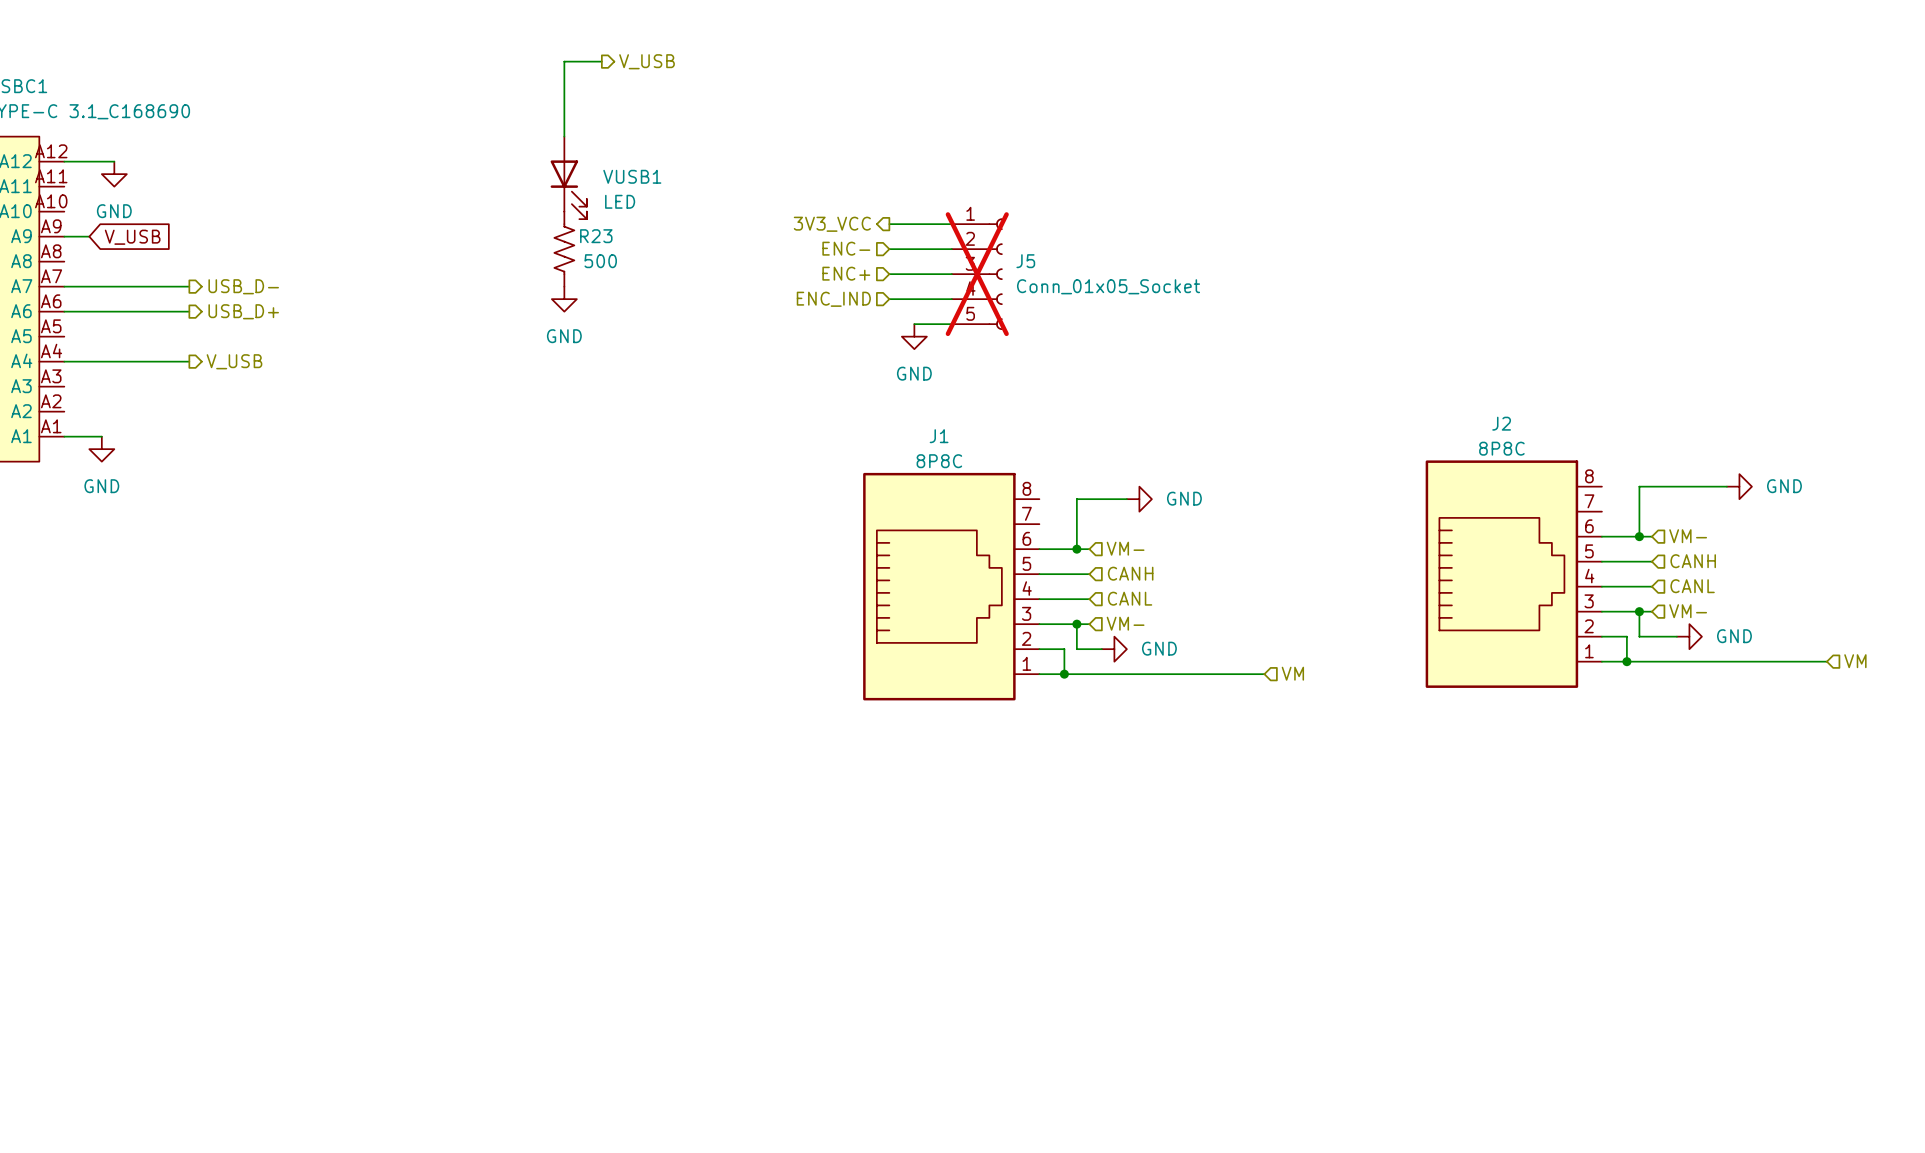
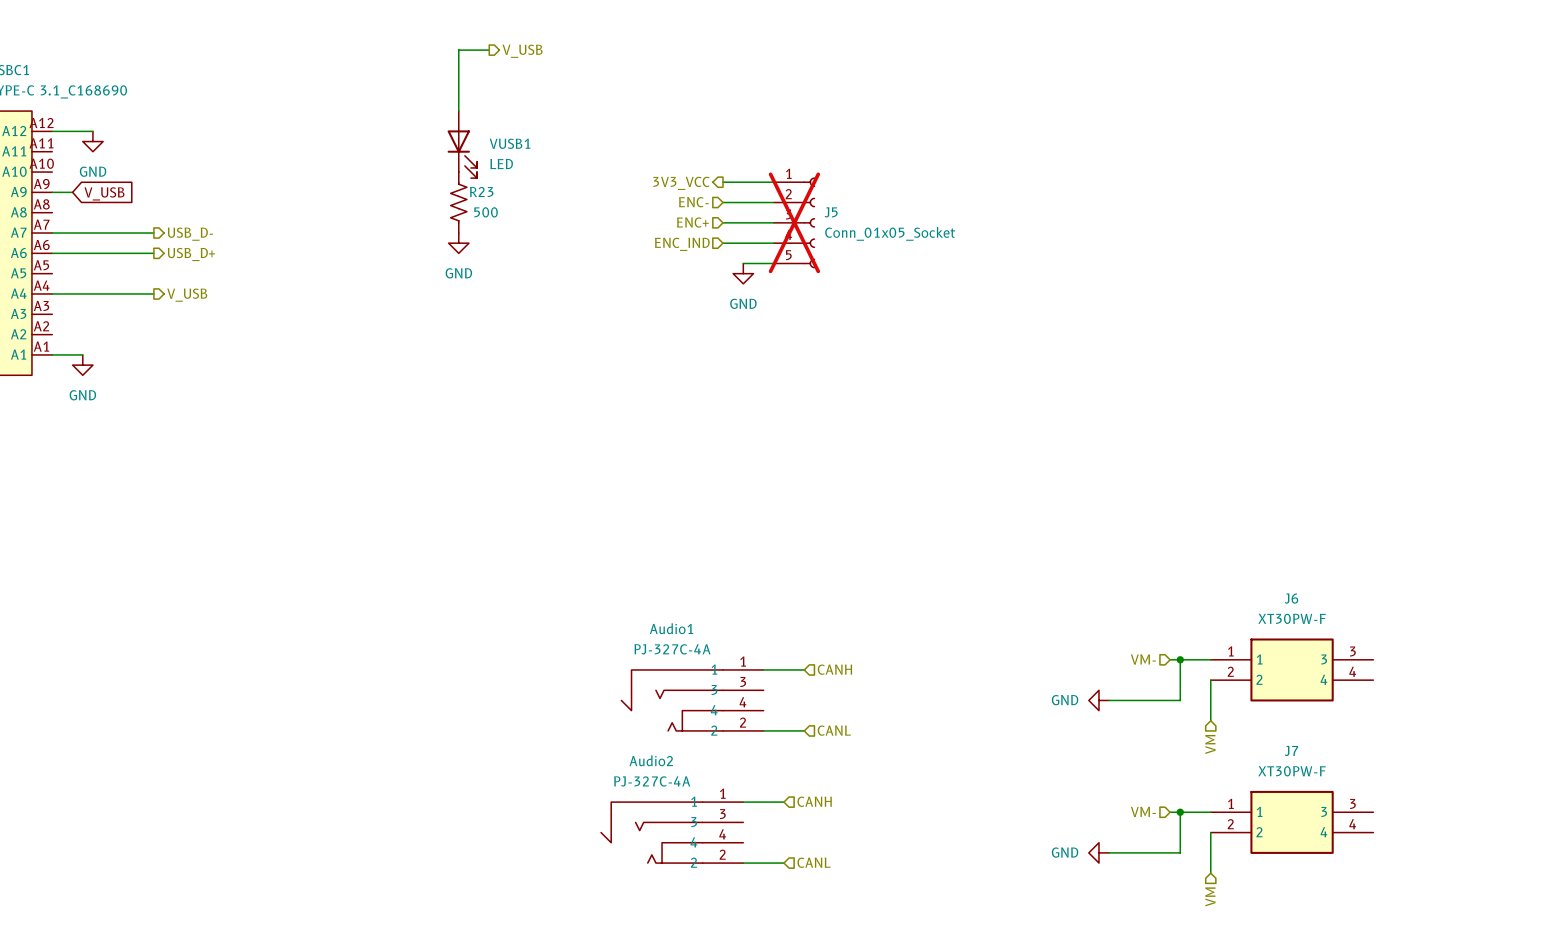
wire: (1726, 486) (1639, 486) (1639, 536) -> none
power symbol: GND (1739, 486) -> none
wire: (1126, 499) (1076, 499) (1076, 549) -> none
power symbol: GND (1139, 499) -> none
wire: (1601, 536) (1651, 536) -> none
junction: (1639, 536) -> none
hierarchical label: VM- (1688, 536) -> none
hierarchical label: VM- (1125, 548) -> none
wire: (1039, 549) (1089, 549) -> none
junction: (1076, 549) -> none
wire: (1601, 561) (1651, 561) -> none
hierarchical label: CANH (1693, 561) -> none
hierarchical label: CANH (1130, 573) -> none
wire: (1039, 574) (1089, 574) -> none
J2: 8P8C (1513, 574) -> none
J1: 8P8C (951, 586) -> none
wire: (1601, 586) (1651, 586) -> none
hierarchical label: CANL (1692, 586) -> none
hierarchical label: CANL (1130, 598) -> none
wire: (1039, 599) (1089, 599) -> none
wire: (1601, 611) (1651, 611) -> none
wire: (1639, 611) (1639, 636) (1676, 636) -> none
junction: (1639, 611) -> none
hierarchical label: VM- (1688, 611) -> none
hierarchical label: VM- (1125, 623) -> none
wire: (1039, 624) (1089, 624) -> (763, 669) (804, 669)
wire: (1076, 624) (1076, 649) (1101, 649) -> none
junction: (1076, 624) -> none
wire: (1601, 636) (1626, 636) (1626, 661) -> none
power symbol: GND (1689, 636) -> none
wire: (1039, 649) (1064, 649) (1064, 674) -> none
power symbol: GND (1114, 649) -> none
wire: (1601, 661) (1826, 661) -> none
junction: (1626, 661) -> none
hierarchical label: VM (1855, 661) -> none
hierarchical label: VM (1292, 673) -> none
wire: (1039, 674) (1264, 674) -> none
junction: (1064, 674) -> none
hierarchical label: none -> VM- (1143, 659)
wire: none -> (1170, 659) (1210, 659)
wire: none -> (1180, 659) (1180, 700) (1109, 700)
junction: none -> (1180, 659)
hierarchical label: none -> CANH (834, 669)
J6: none -> XT30PW-F (1292, 669)
wire: none -> (1210, 680) (1210, 720)
Audio1: none -> PJ-327C-4A (692, 700)
power symbol: none -> GND (1098, 700)
hierarchical label: none -> CANL (834, 730)
wire: none -> (763, 730) (804, 730)
hierarchical label: none -> VM (1210, 744)
wire: none -> (743, 802) (783, 802)
hierarchical label: none -> CANH (814, 801)
hierarchical label: none -> VM- (1143, 811)
wire: none -> (1170, 812) (1210, 812)
wire: none -> (1180, 812) (1180, 852) (1109, 852)
junction: none -> (1180, 812)
J7: none -> XT30PW-F (1292, 822)
Audio2: none -> PJ-327C-4A (672, 832)
wire: none -> (1210, 832) (1210, 873)
power symbol: none -> GND (1098, 852)
wire: none -> (743, 863) (783, 863)
hierarchical label: none -> CANL (814, 862)
hierarchical label: none -> VM (1210, 896)

